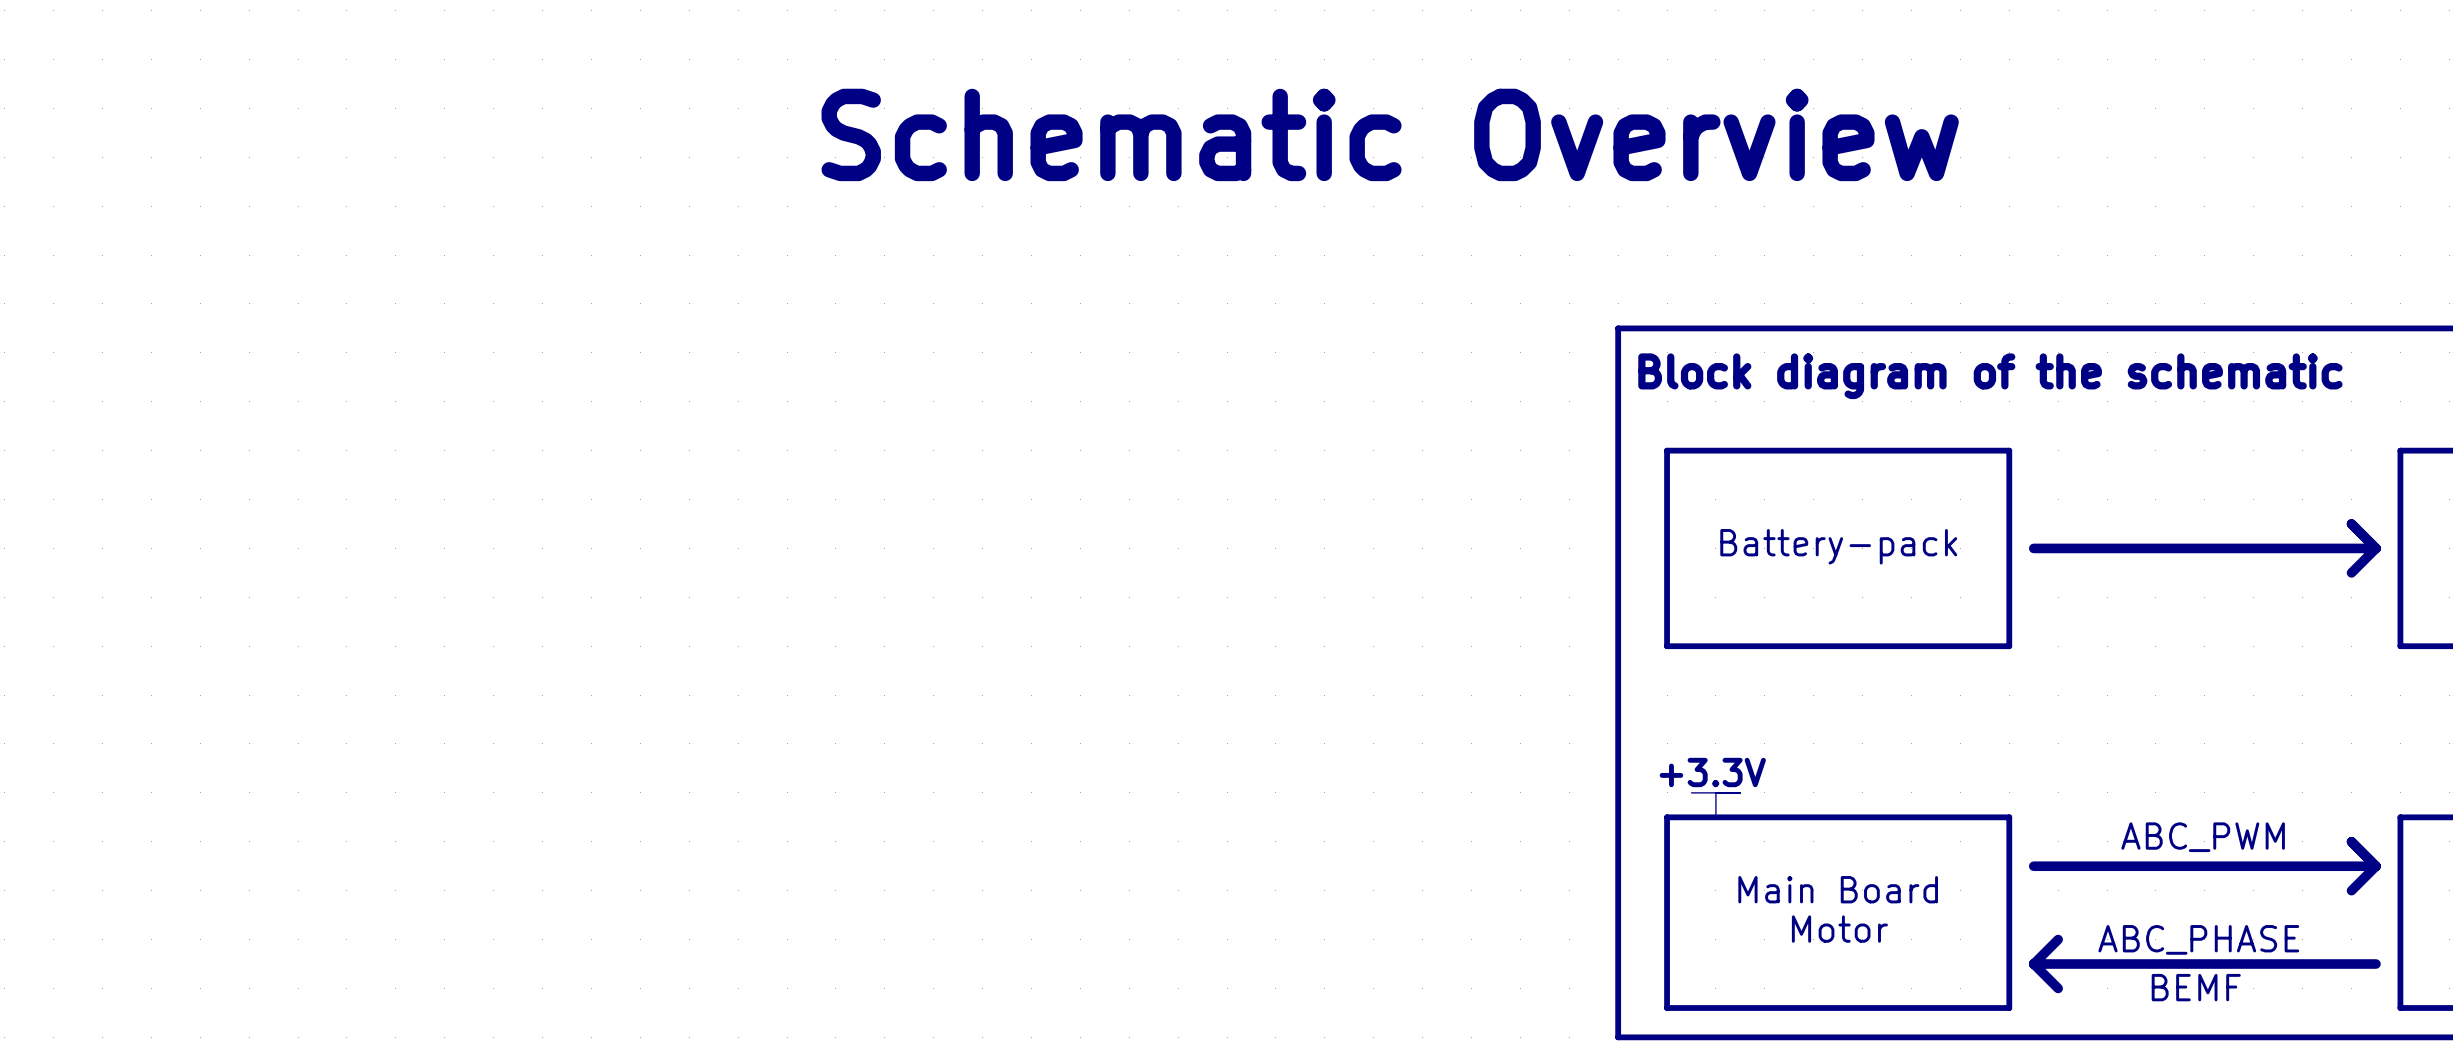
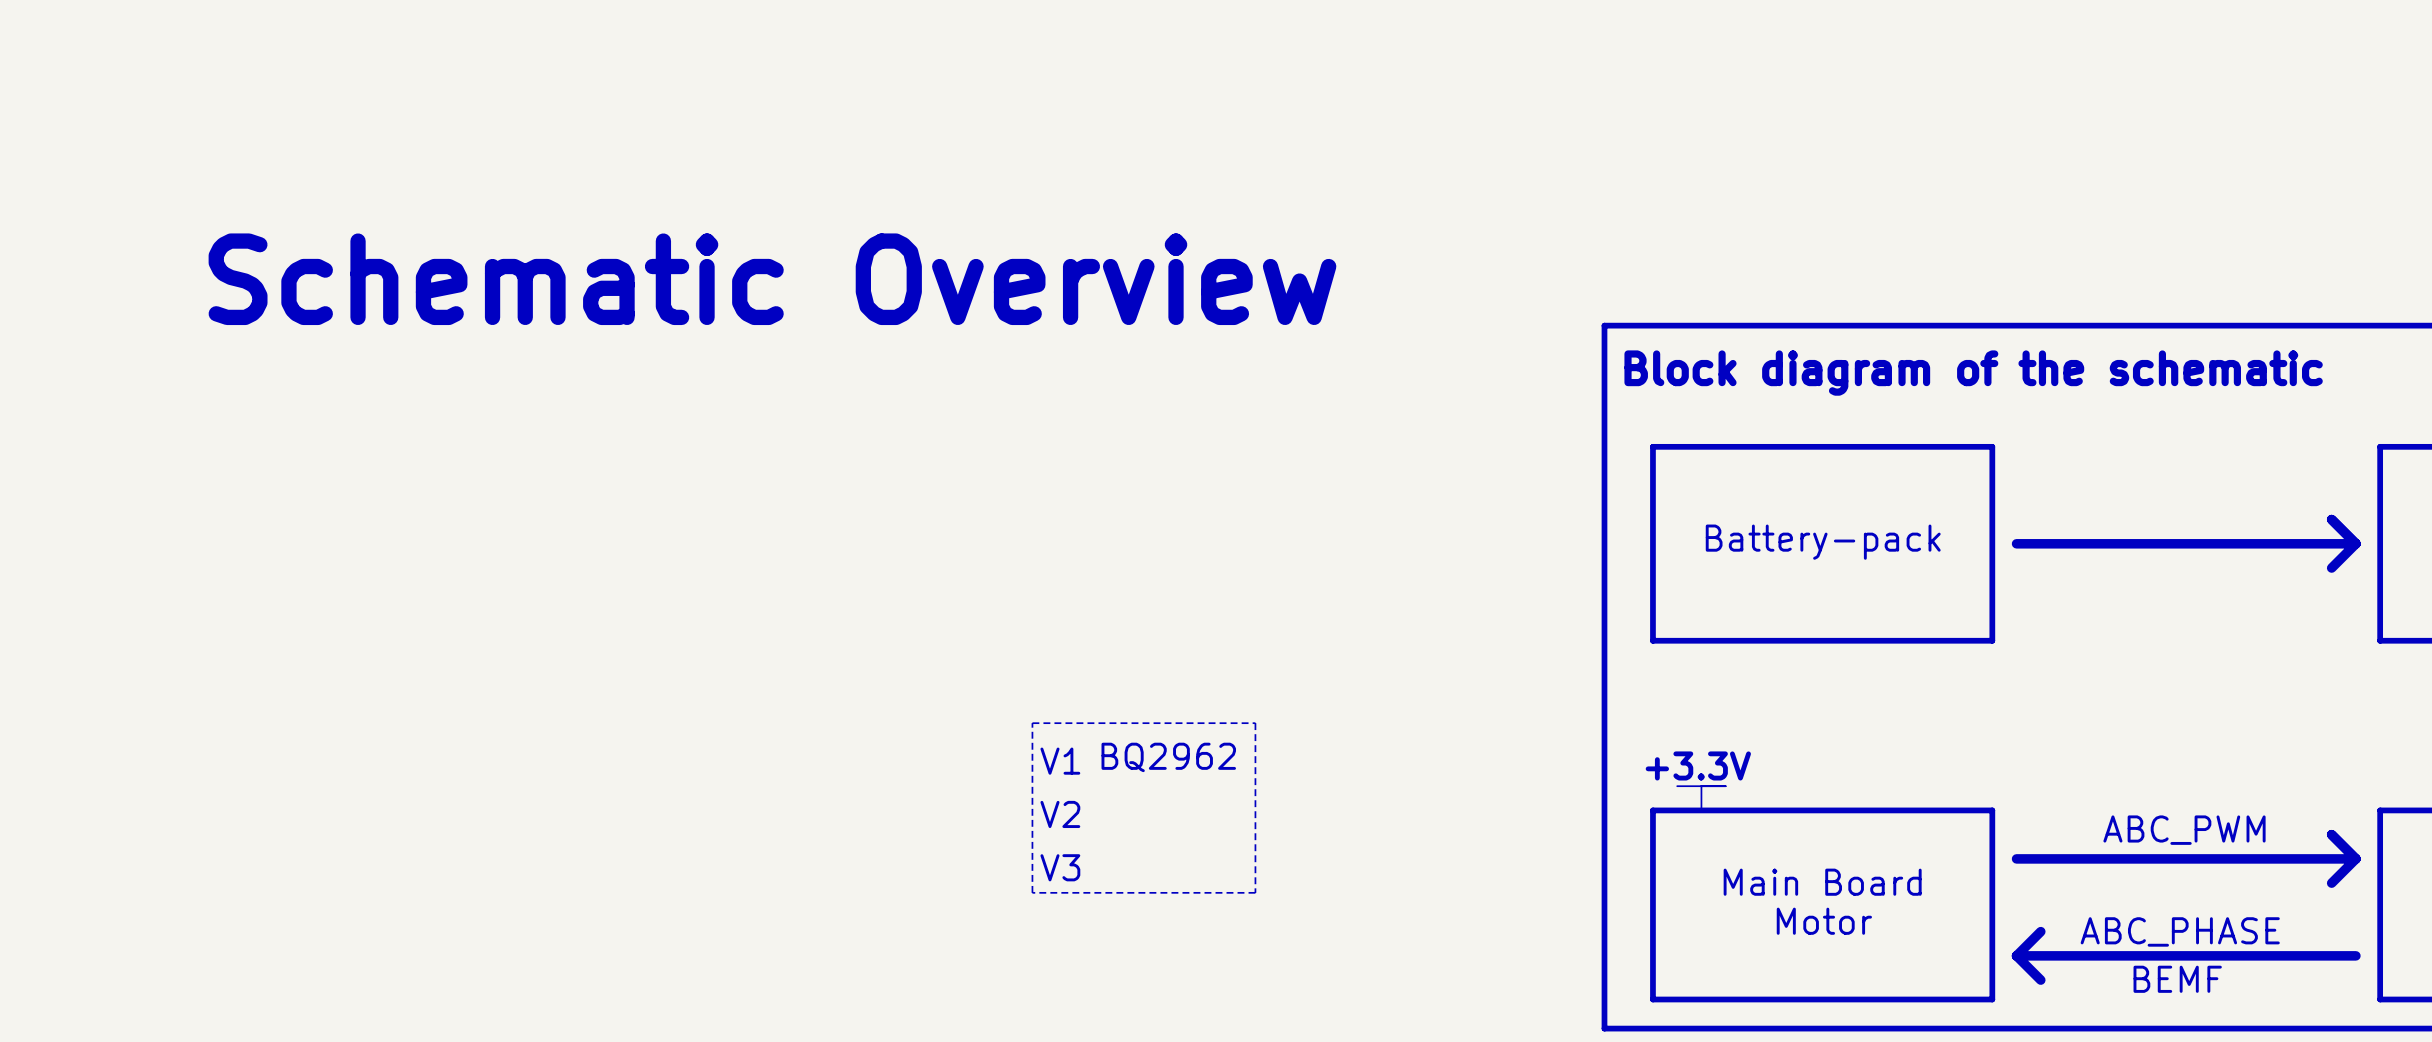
text: Schematic Overview (1390, 134) -> none
text: none -> Schematic Overview (772, 279)
line: none -> (1032, 723) (1255, 723) (1255, 892) (1032, 892) (1032, 723)
text: none -> BQ2962 (1168, 757)
text: none -> V1 (1060, 761)
text: none -> V2 (1060, 814)
text: none -> V3 (1060, 867)

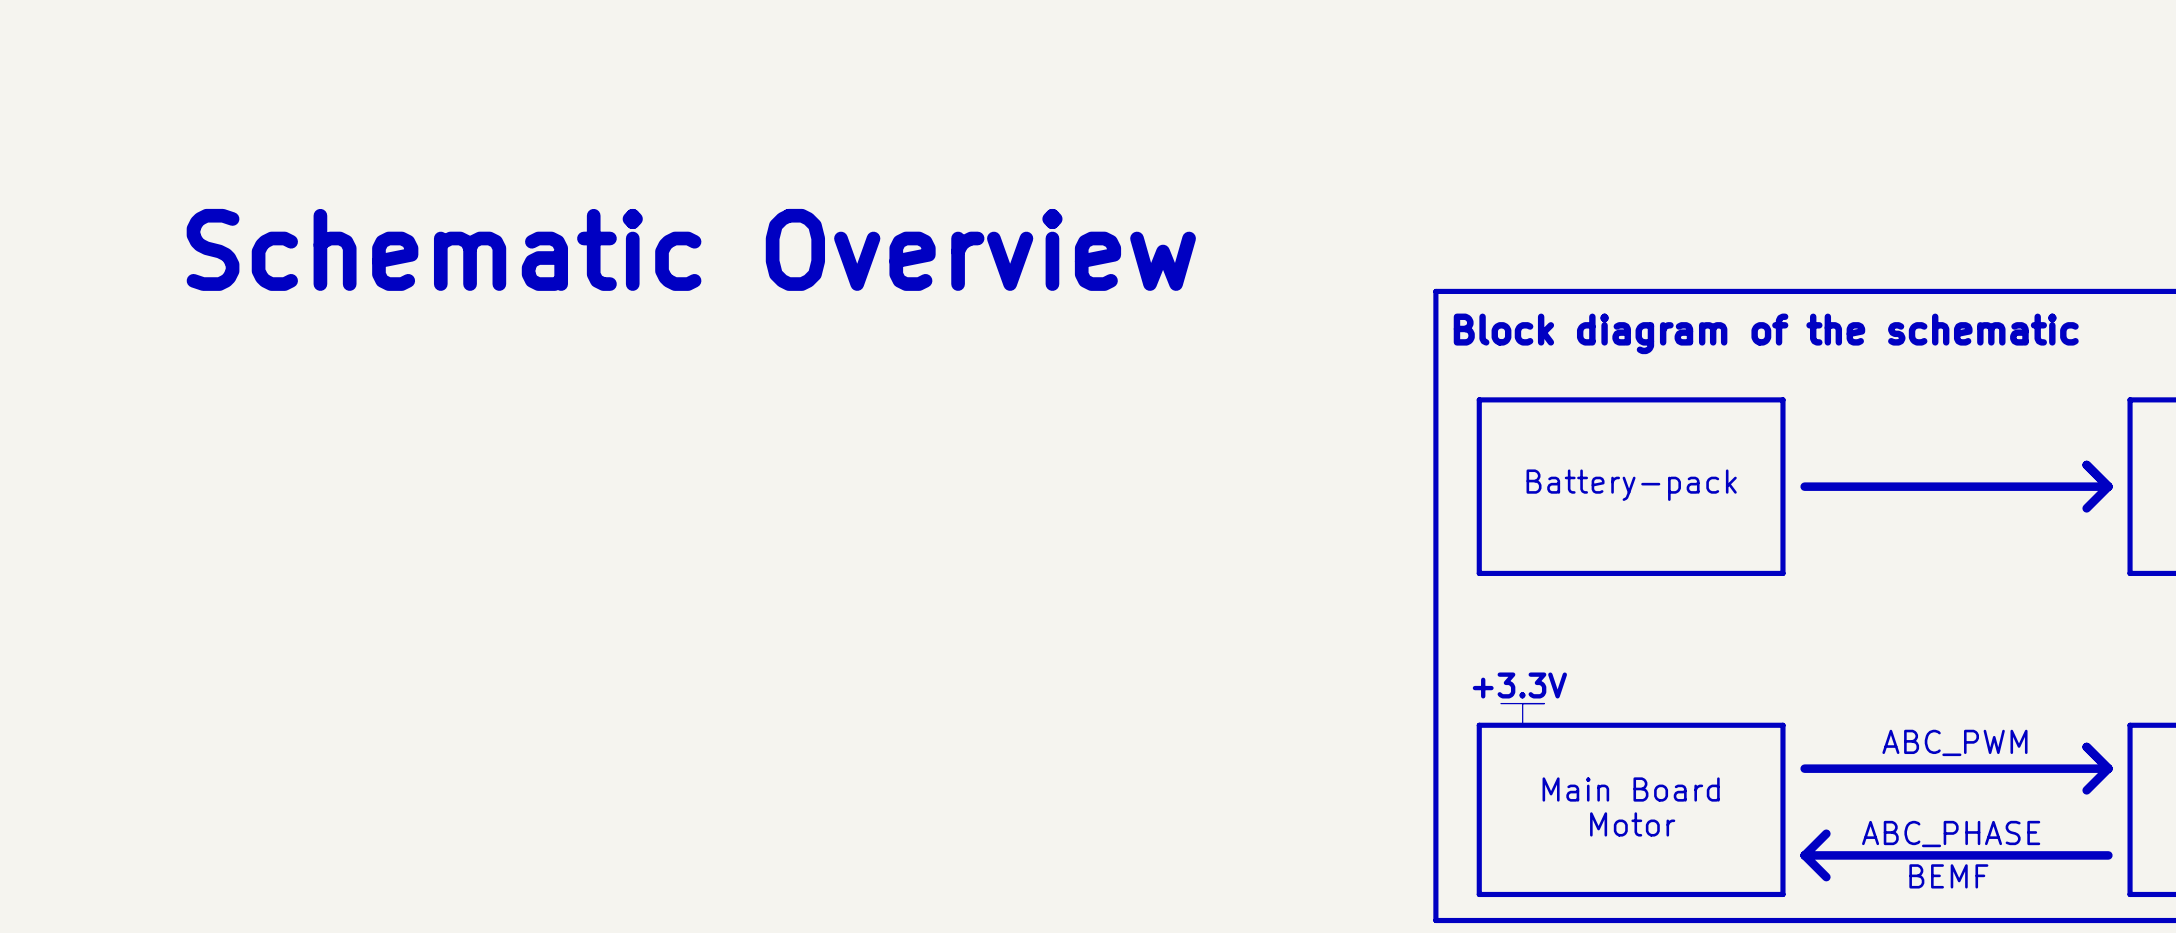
line: (1032, 723) (1255, 723) (1255, 892) (1032, 892) (1032, 723) -> none
text: BQ2962 (1168, 757) -> none
text: V1 (1060, 761) -> none
text: V2 (1060, 814) -> none
text: V3 (1060, 867) -> none

